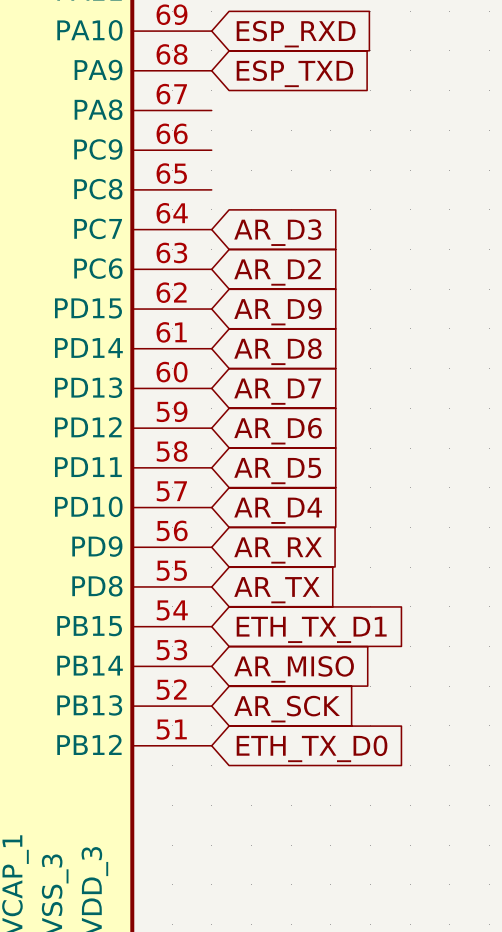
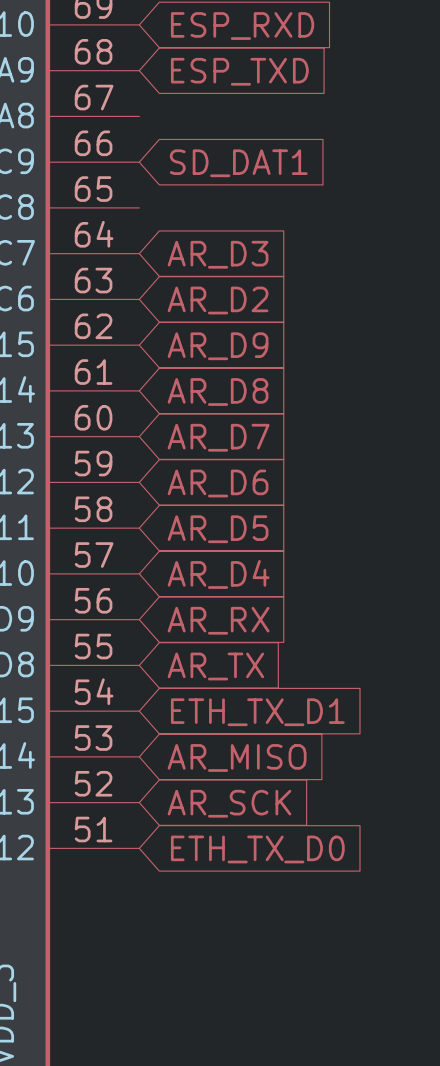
global label: none -> SD_DAT1 (238, 163)

